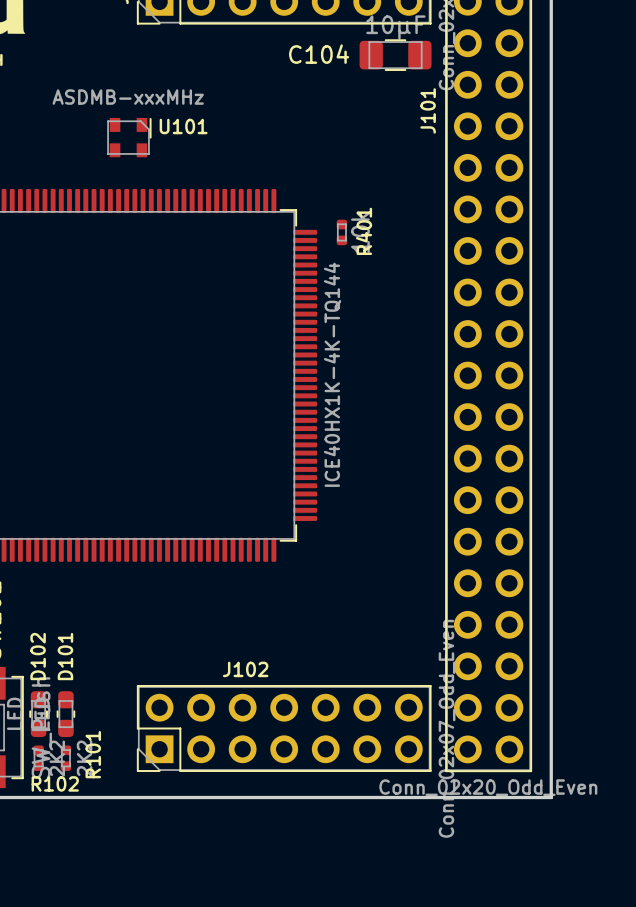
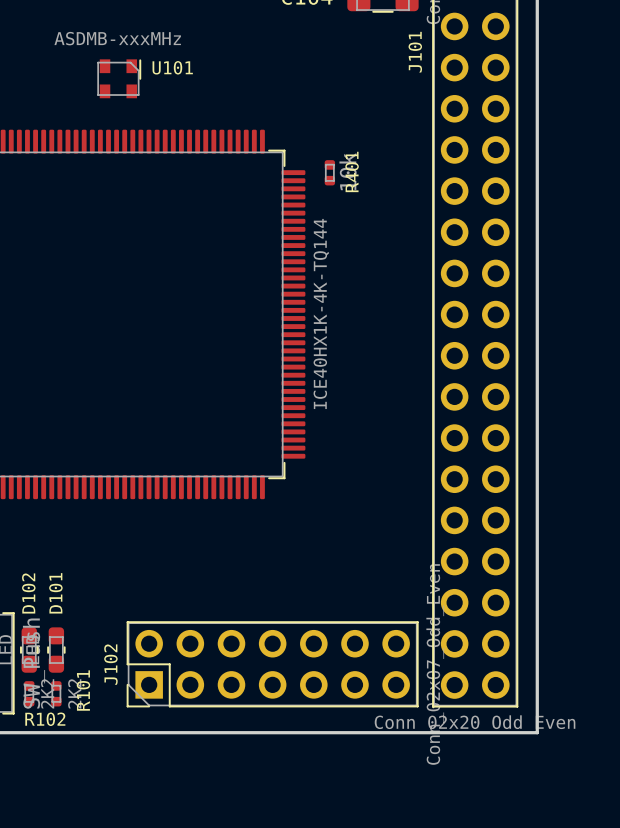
J102 name rotation: 0° (245, 669) -> 90° counterclockwise (110, 664)
J102 name position: J102 (245, 669) -> J102 (110, 664)

